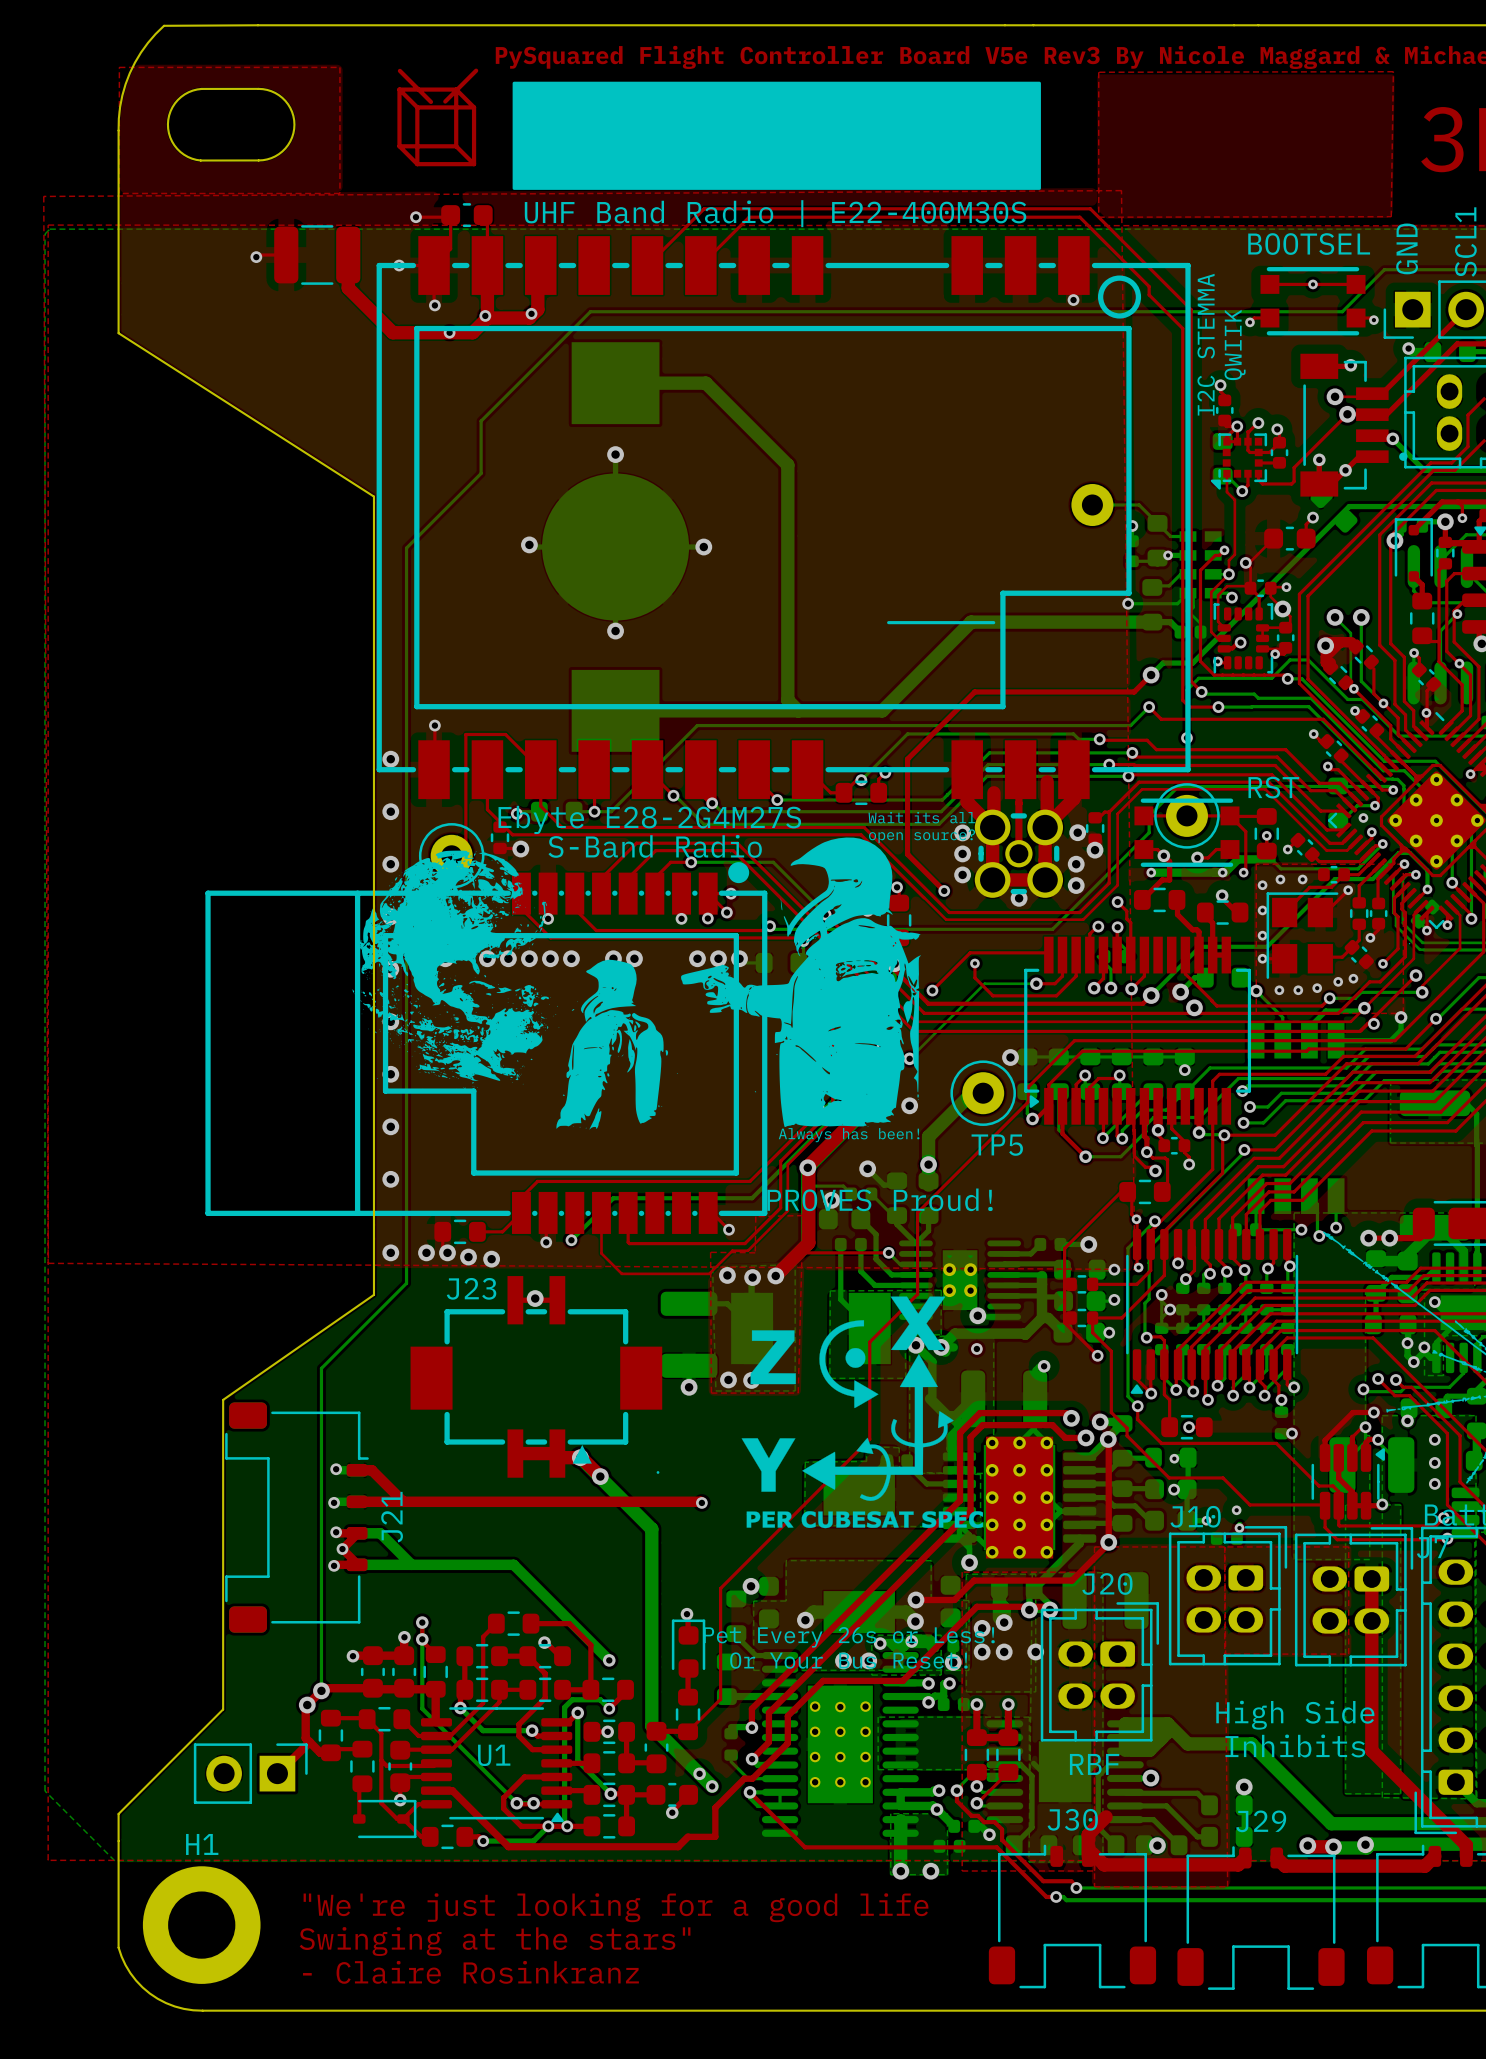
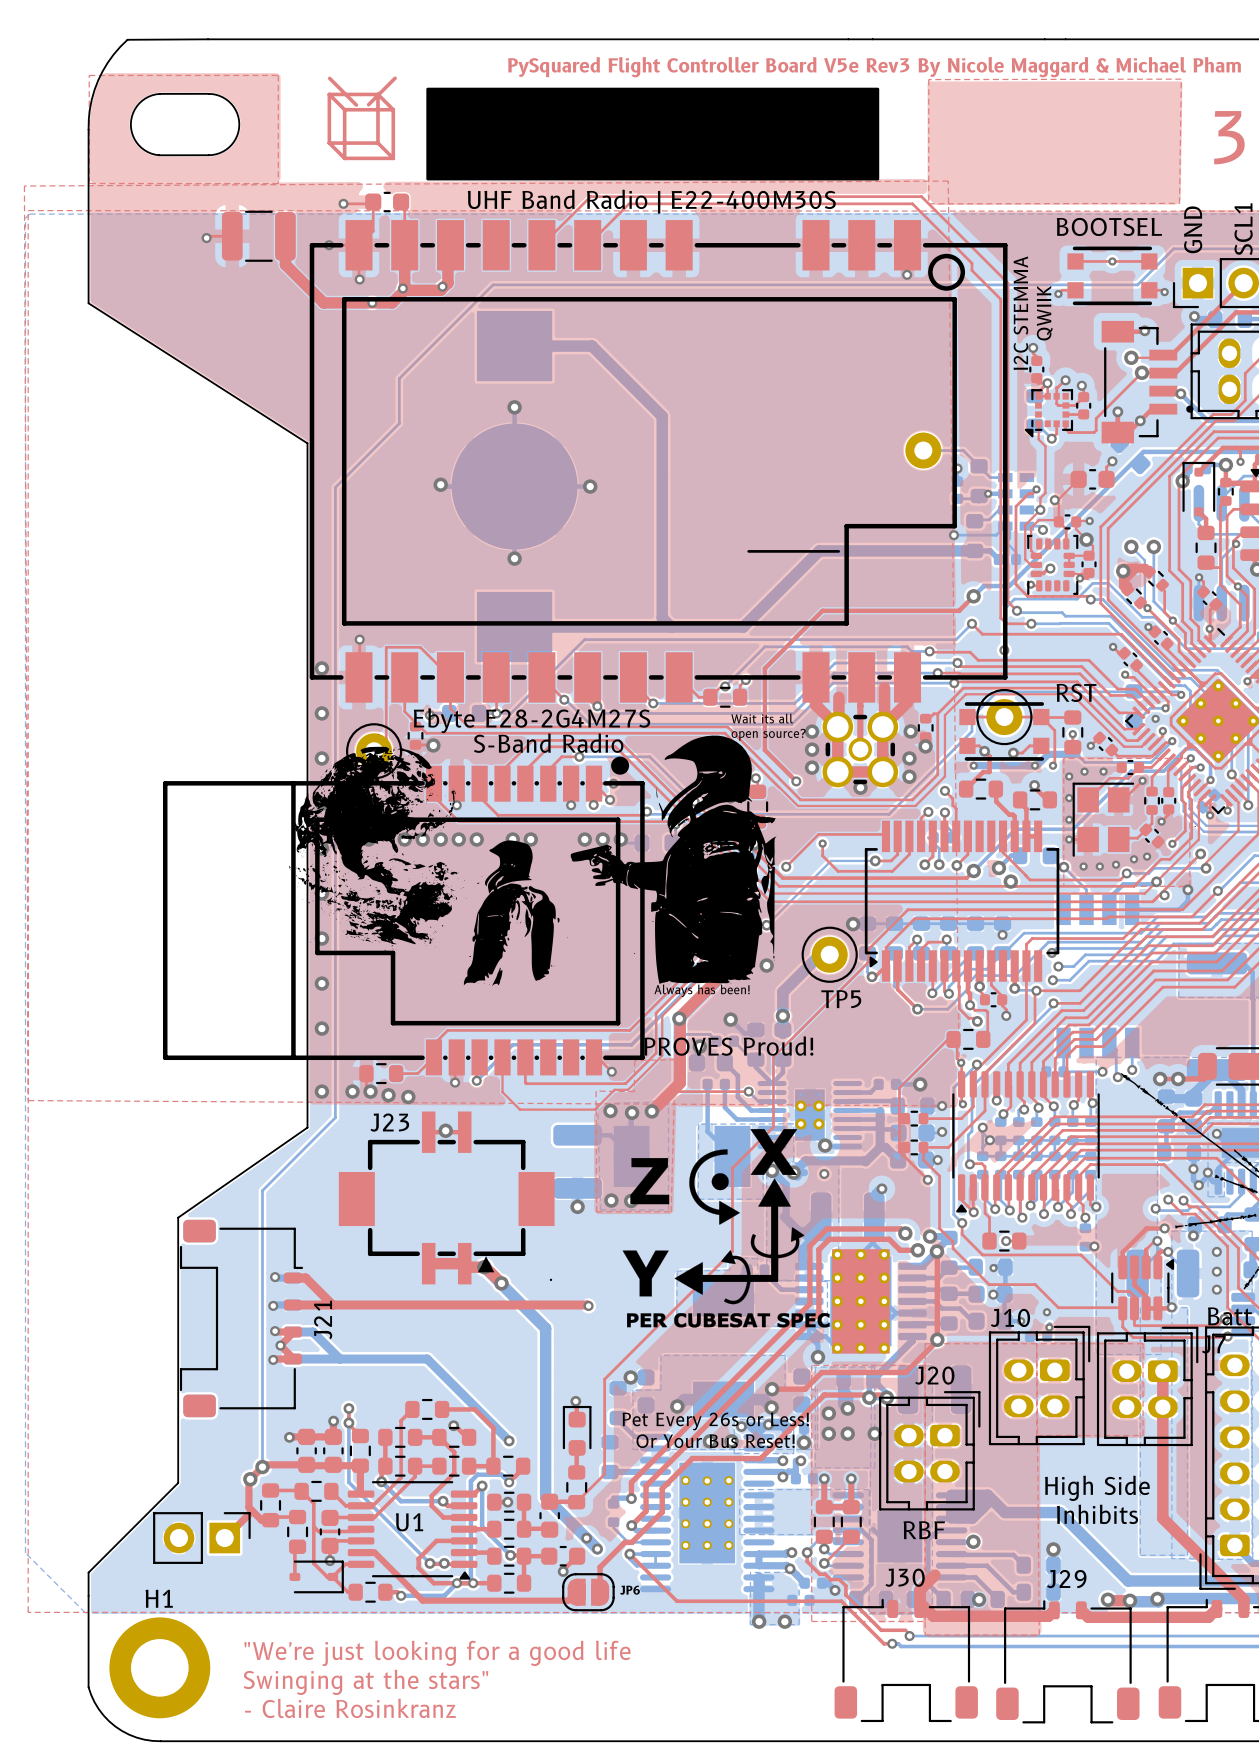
top track: (688, 1836) (715, 1836) -> none
JP6: none -> (588, 1592)

